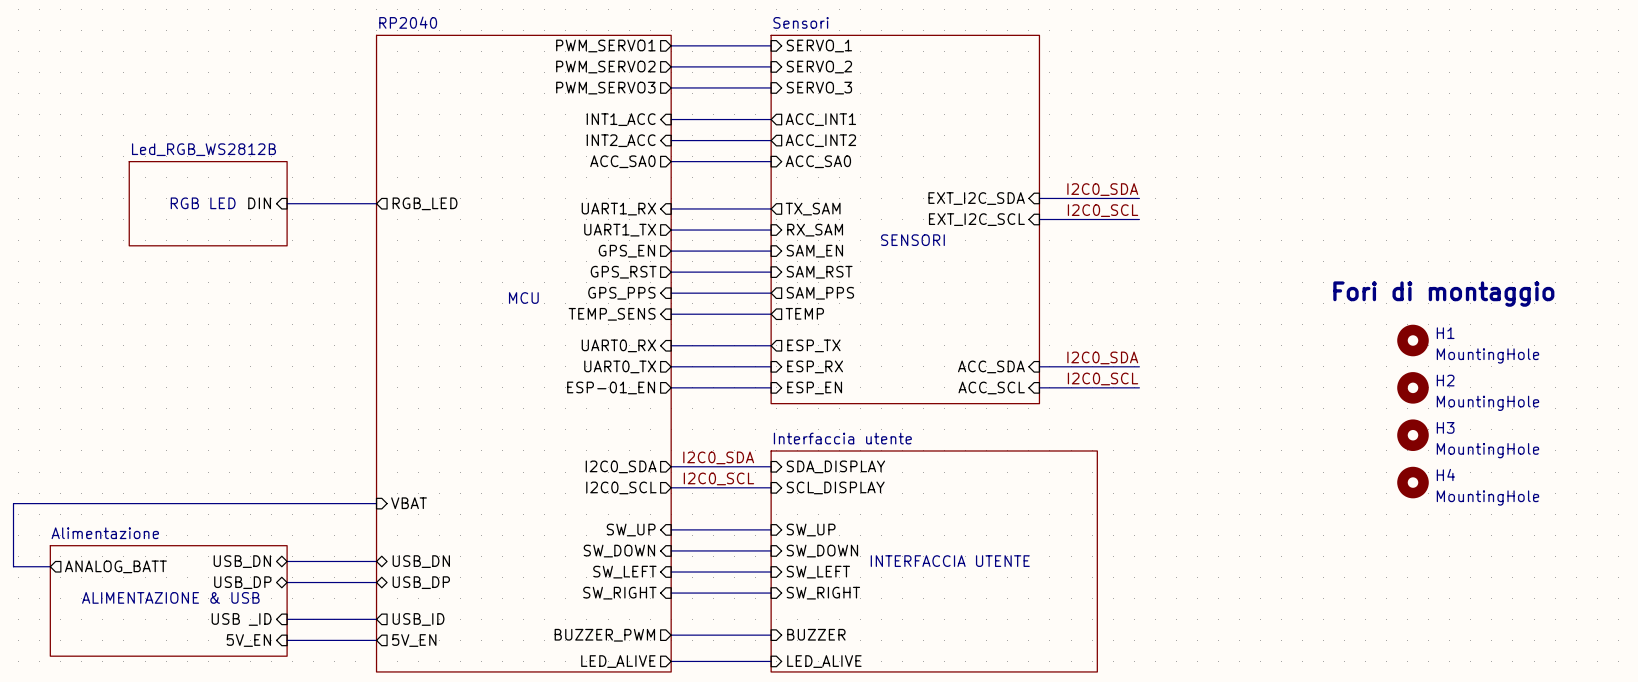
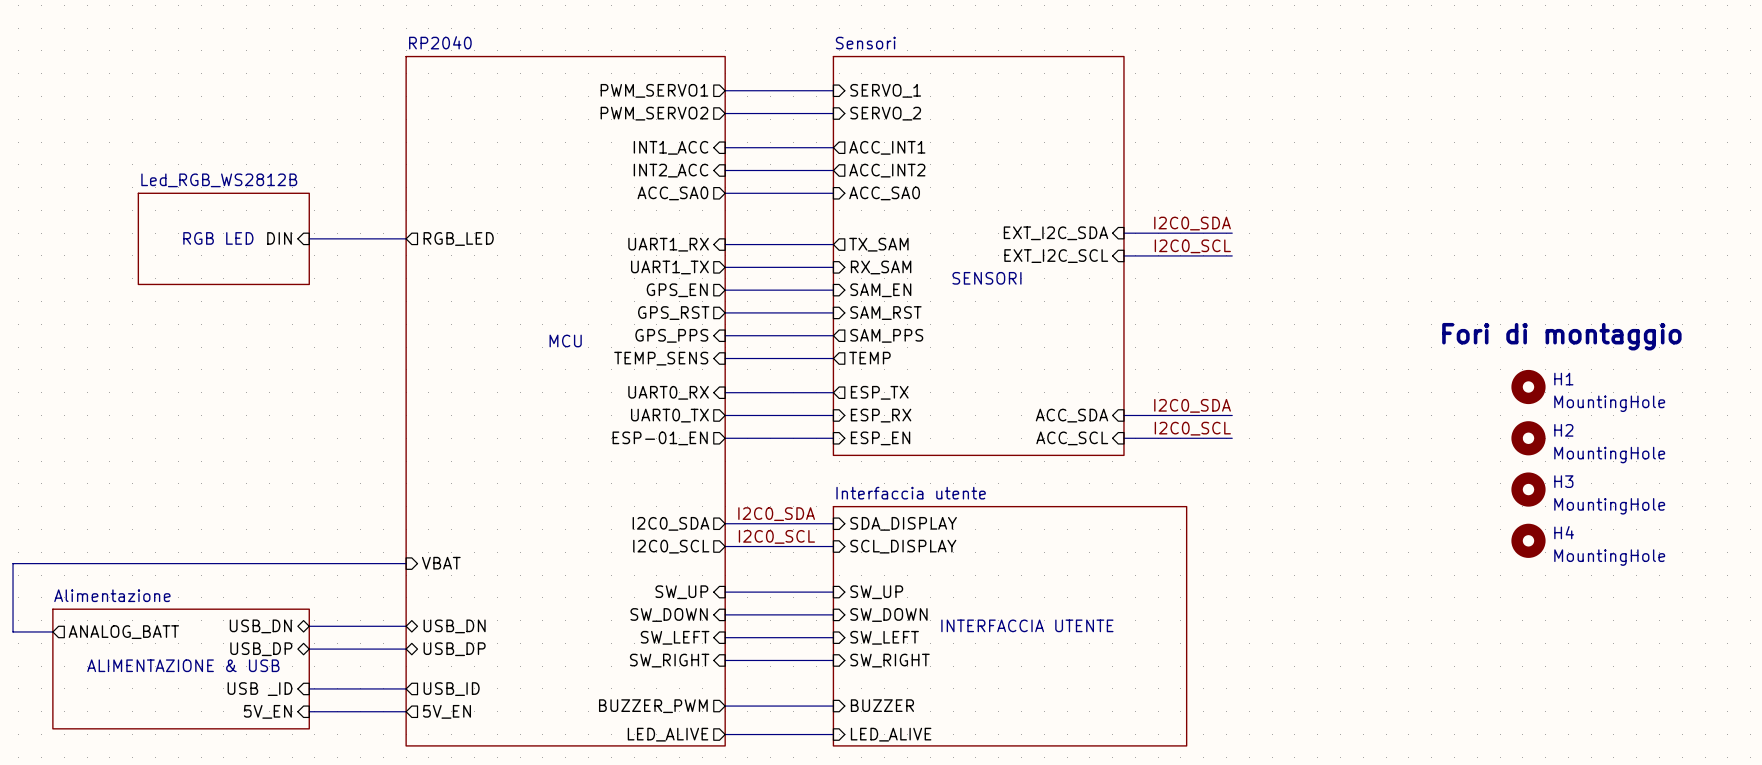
sheet pin: PWM_SERVO1 (605, 45) -> none
wire: (671, 45) (771, 45) -> none
sheet pin: SERVO_1 (819, 45) -> none
sheet pin: PWM_SERVO2 (605, 67) -> PWM_SERVO1 (654, 90)
sheet pin: SERVO_2 (819, 67) -> SERVO_1 (885, 90)
sheet pin: PWM_SERVO3 (605, 88) -> PWM_SERVO2 (654, 113)
sheet pin: SERVO_3 (819, 88) -> SERVO_2 (885, 113)

